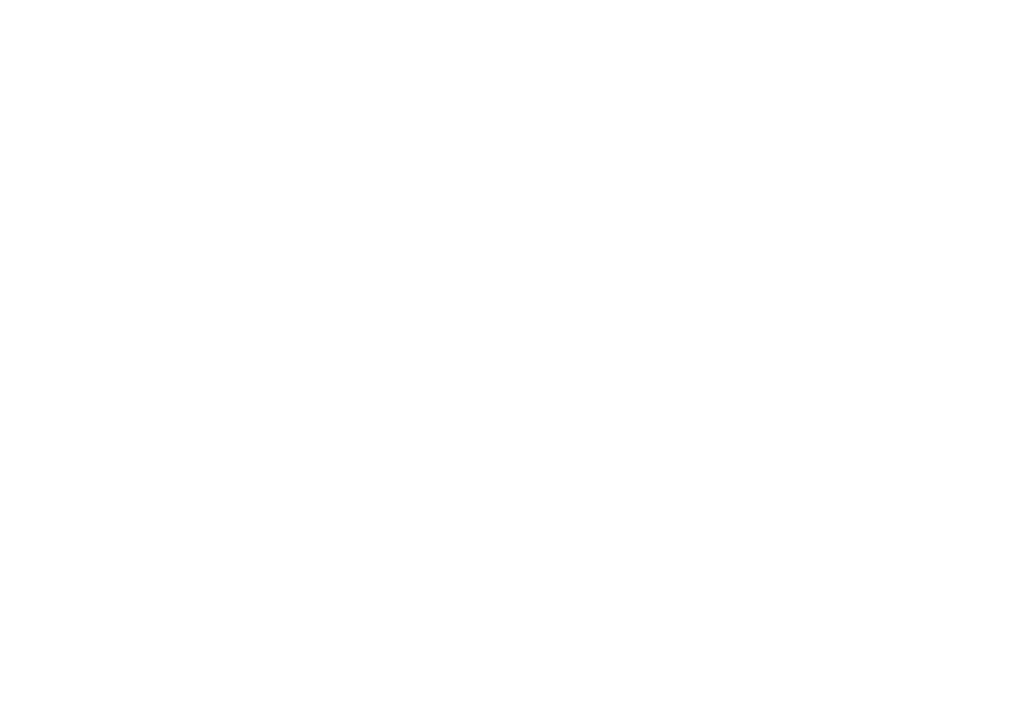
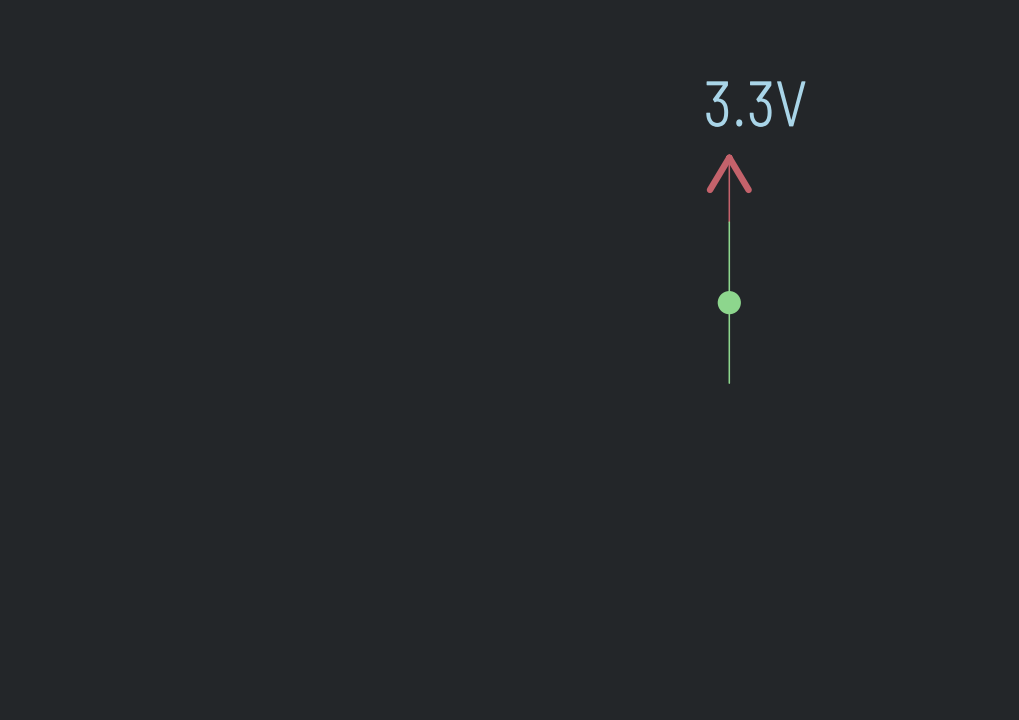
power symbol: none -> 3.3V (729, 188)
wire: none -> (729, 222) (729, 383)
junction: none -> (729, 302)

